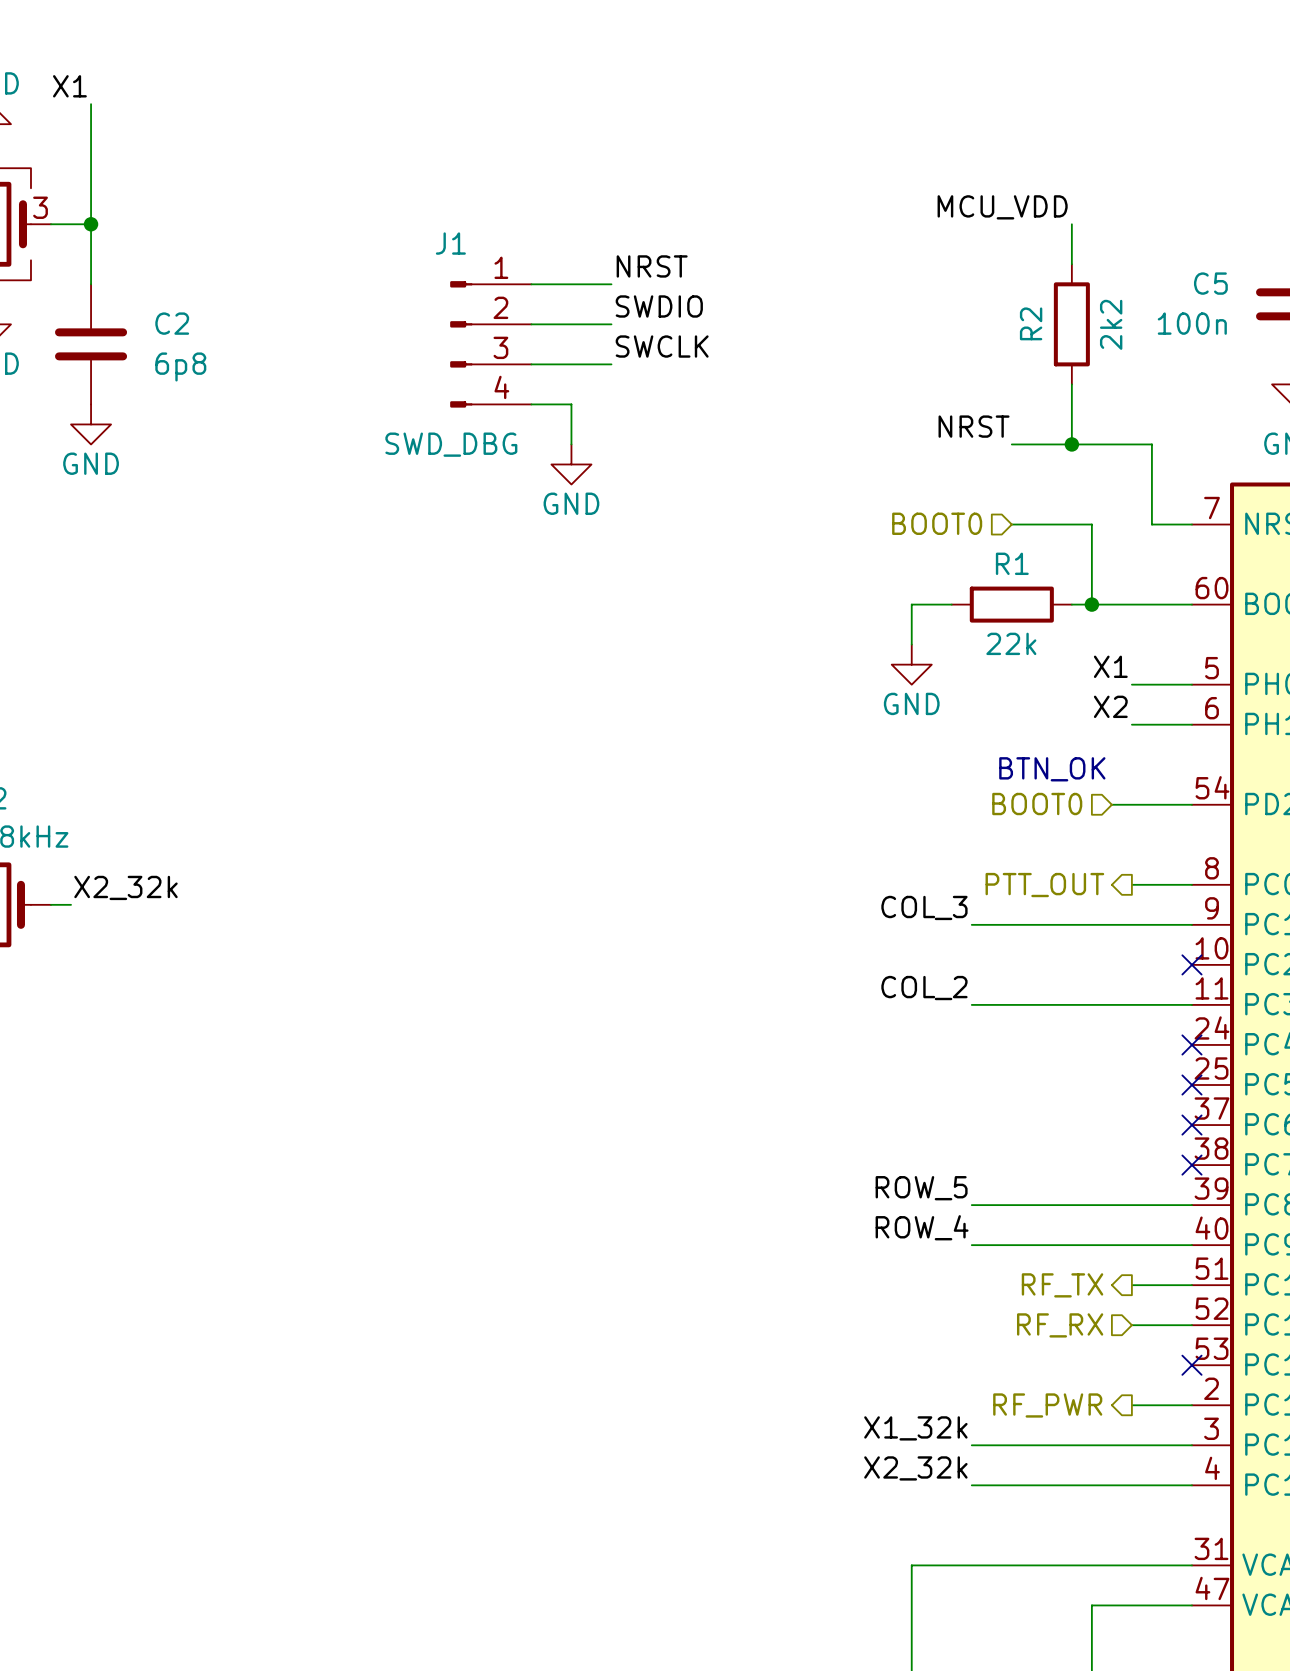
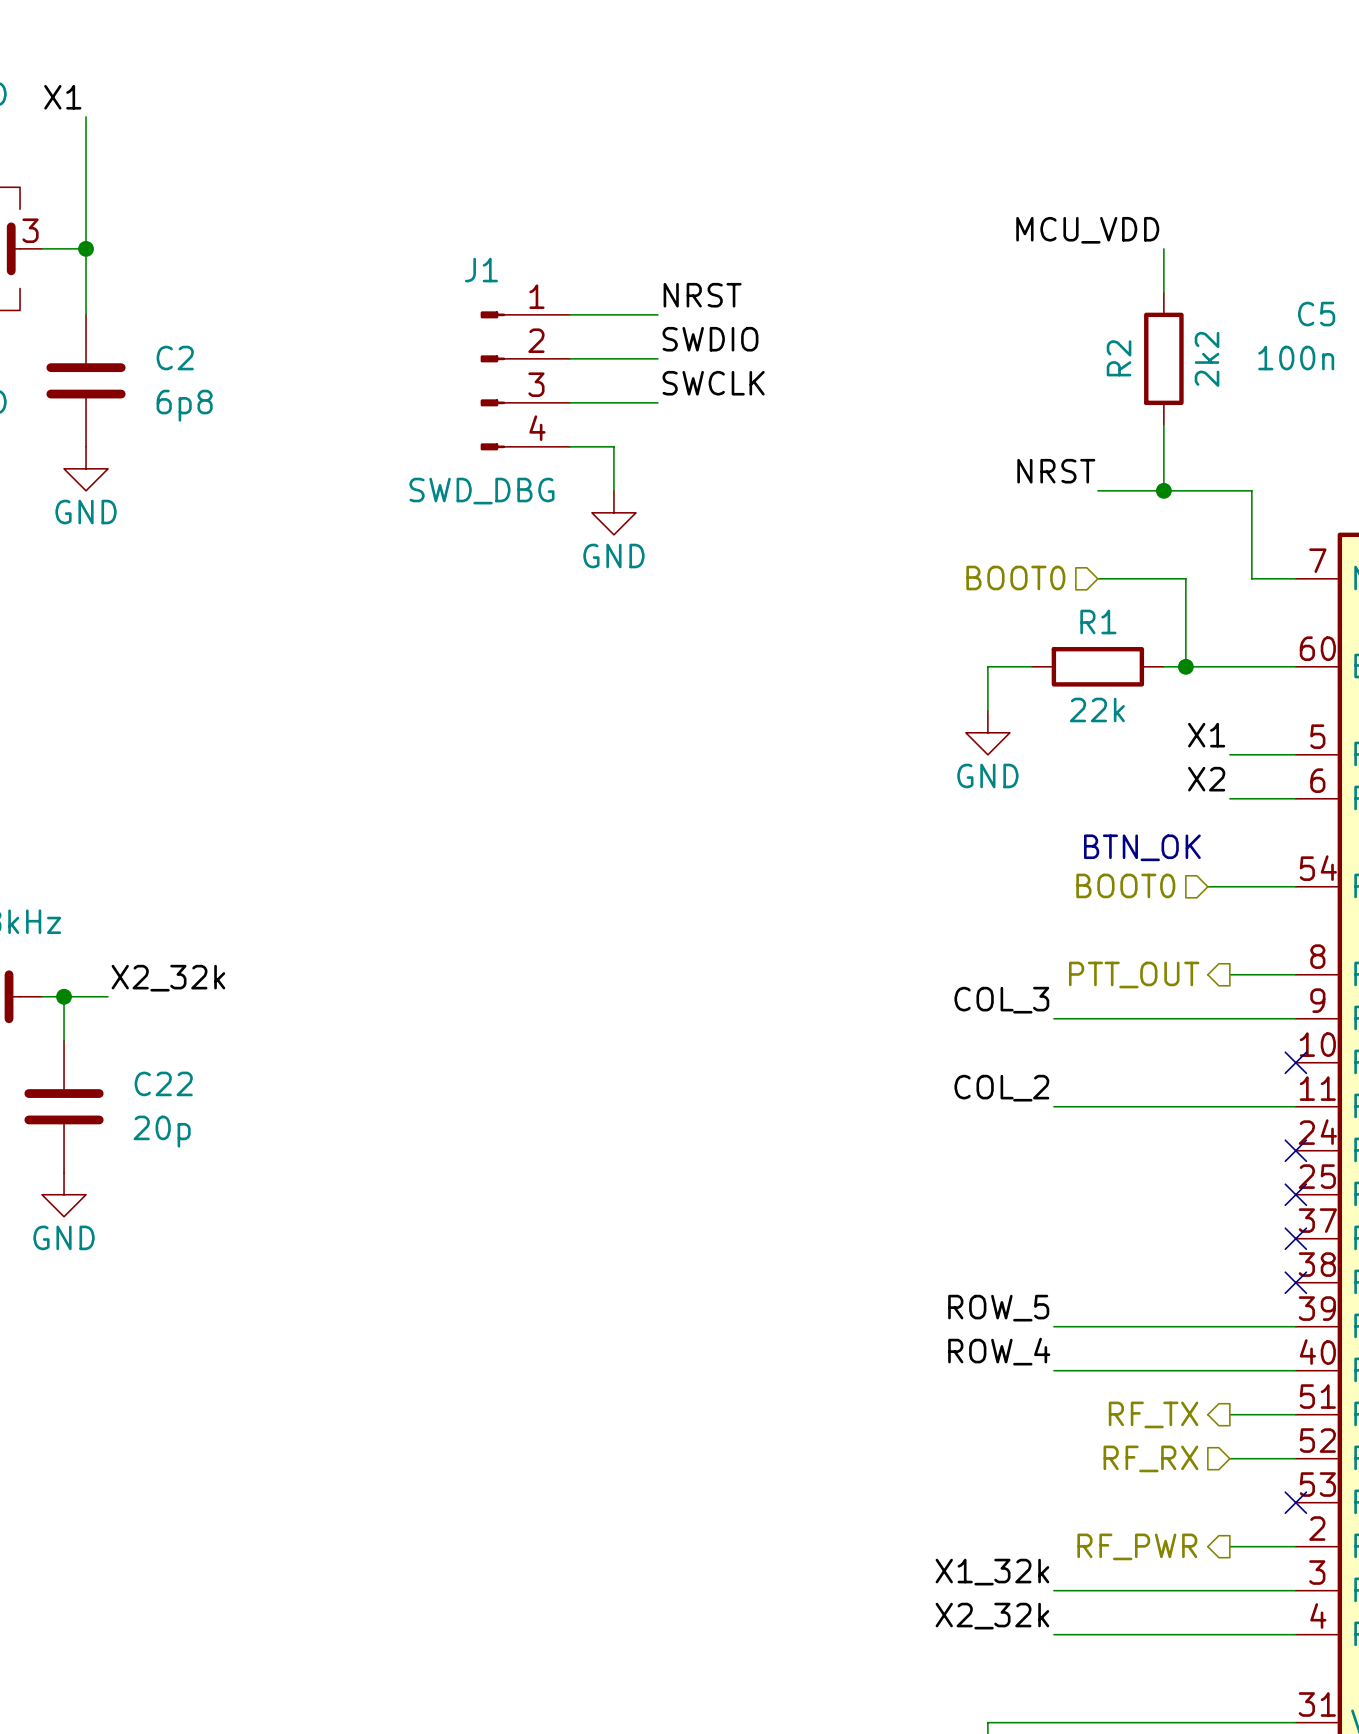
label position: X2_32k (125, 887) -> X2_32k (168, 978)
junction: none -> (64, 996)
wire: none -> (108, 996) (64, 996) (64, 1040)
C22: none -> 20p (64, 1106)
power symbol: none -> GND (64, 1194)

